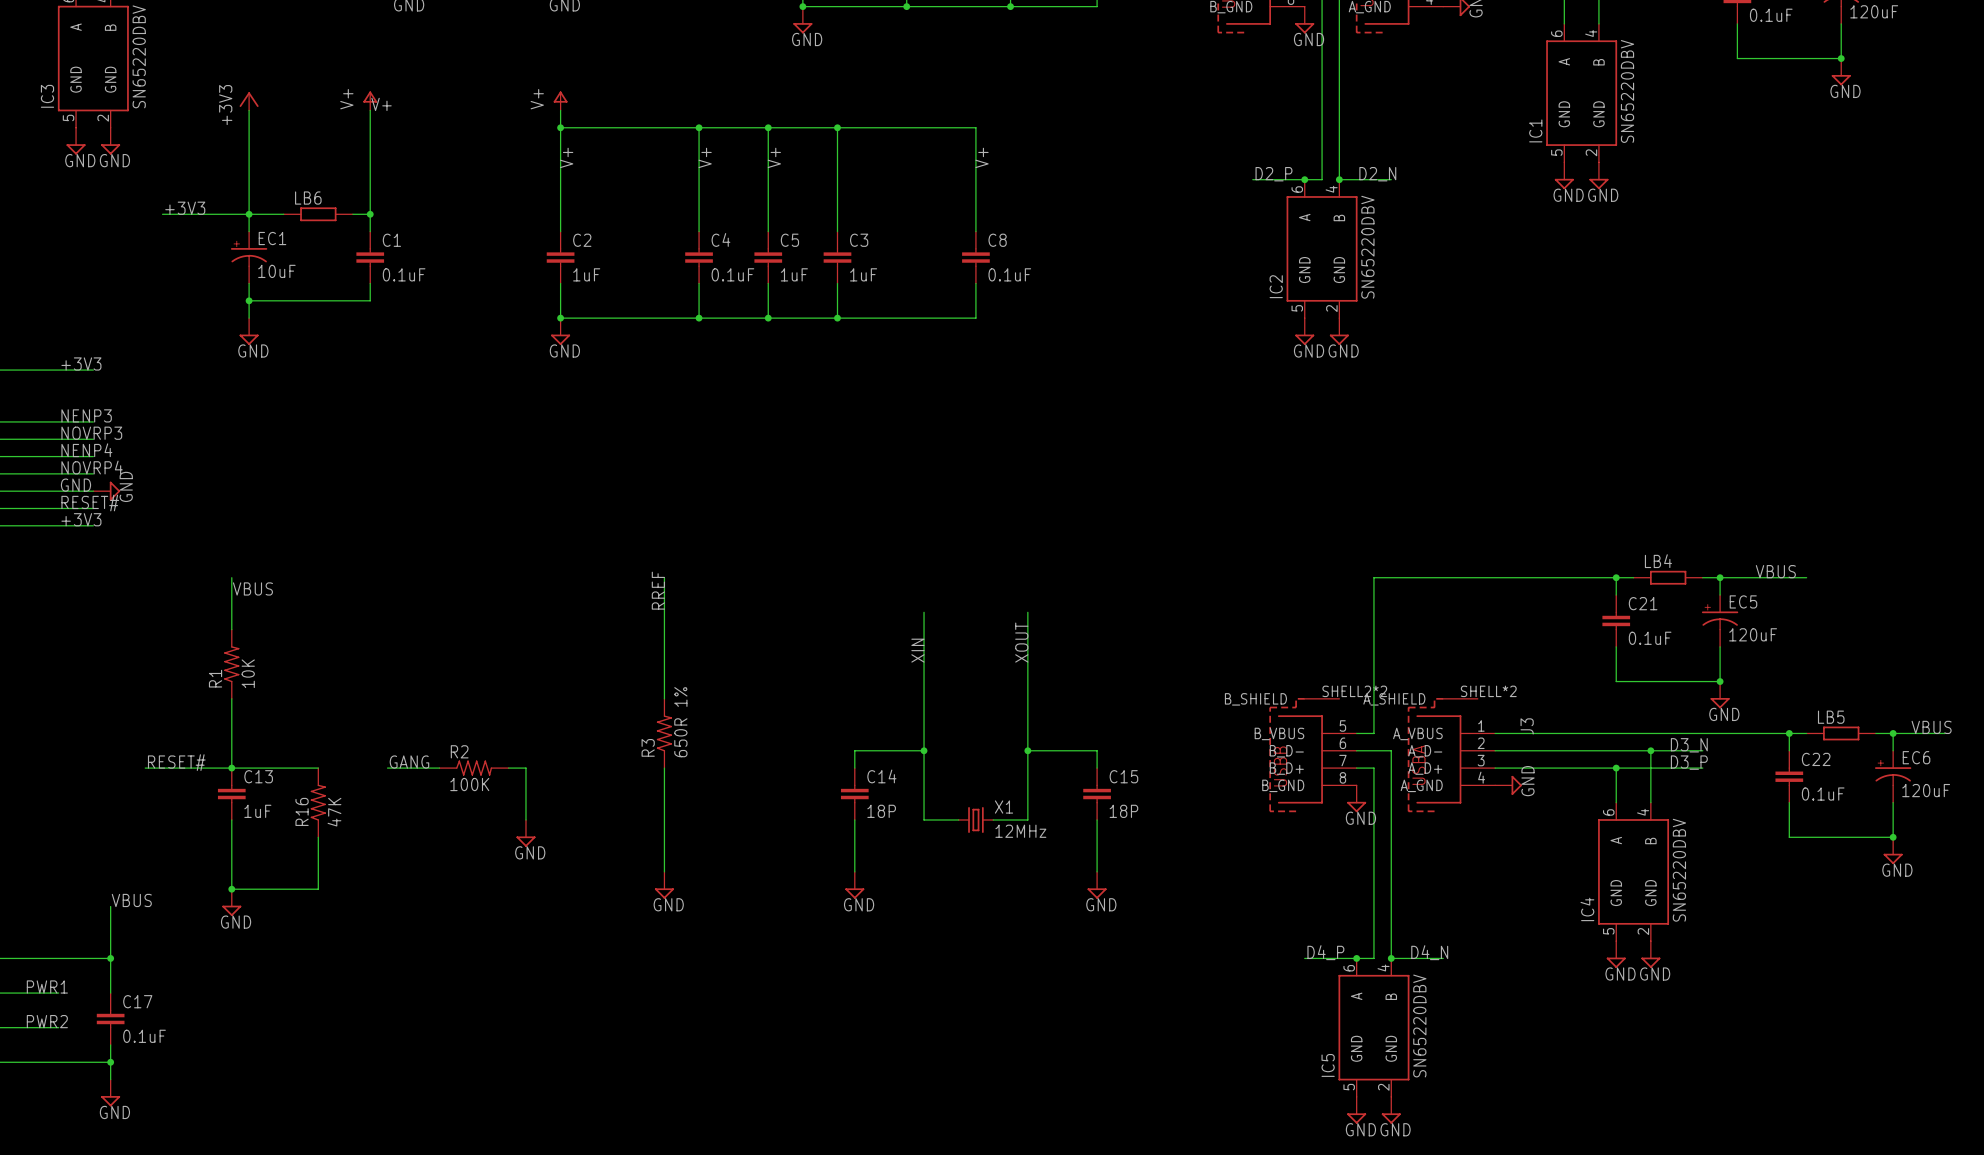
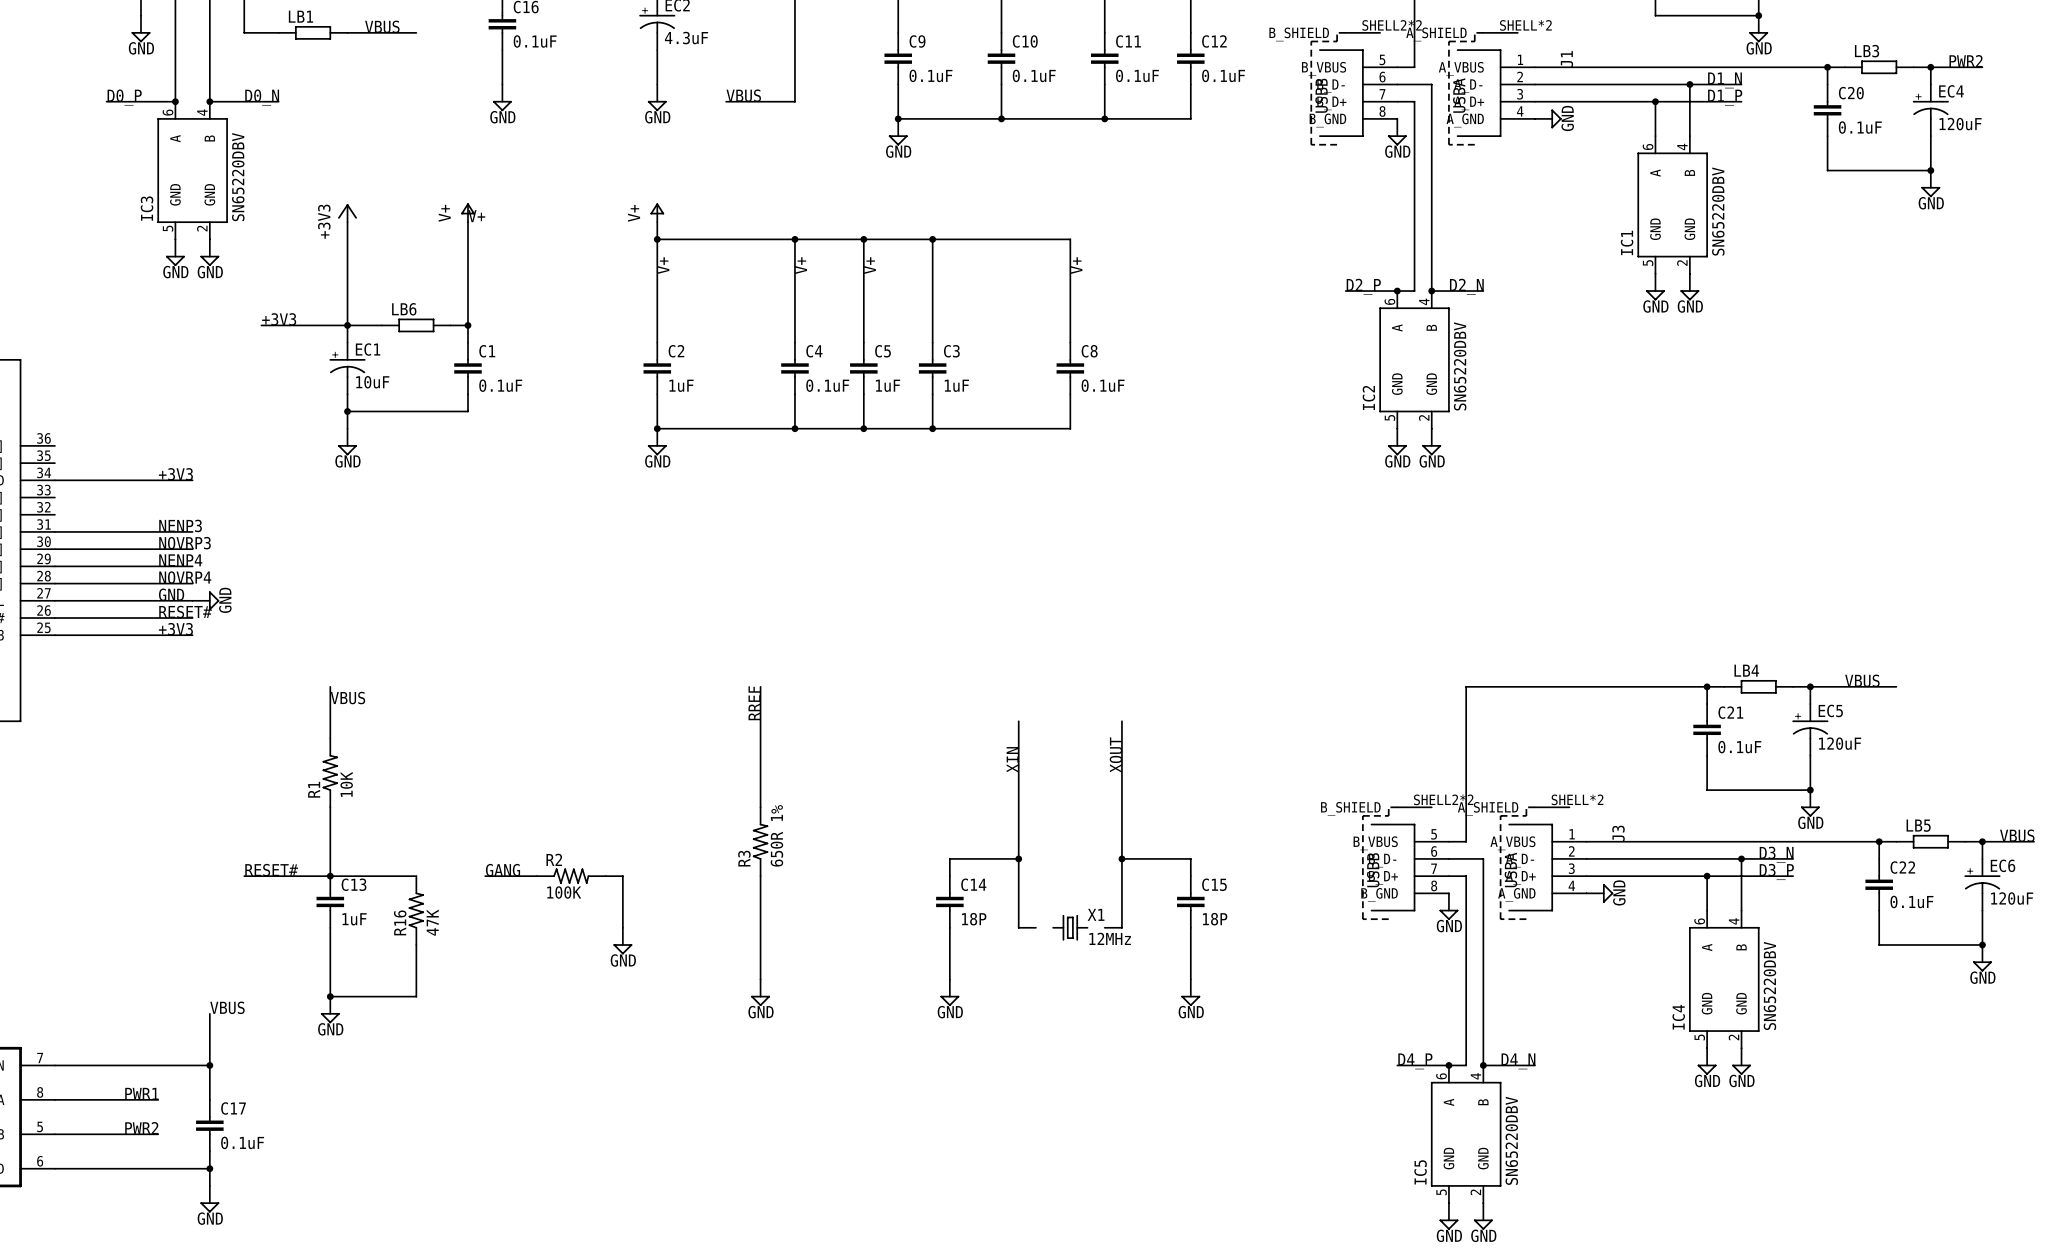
wire: (941, 819) (958, 819) -> none
wire: (993, 819) (1010, 819) -> none

